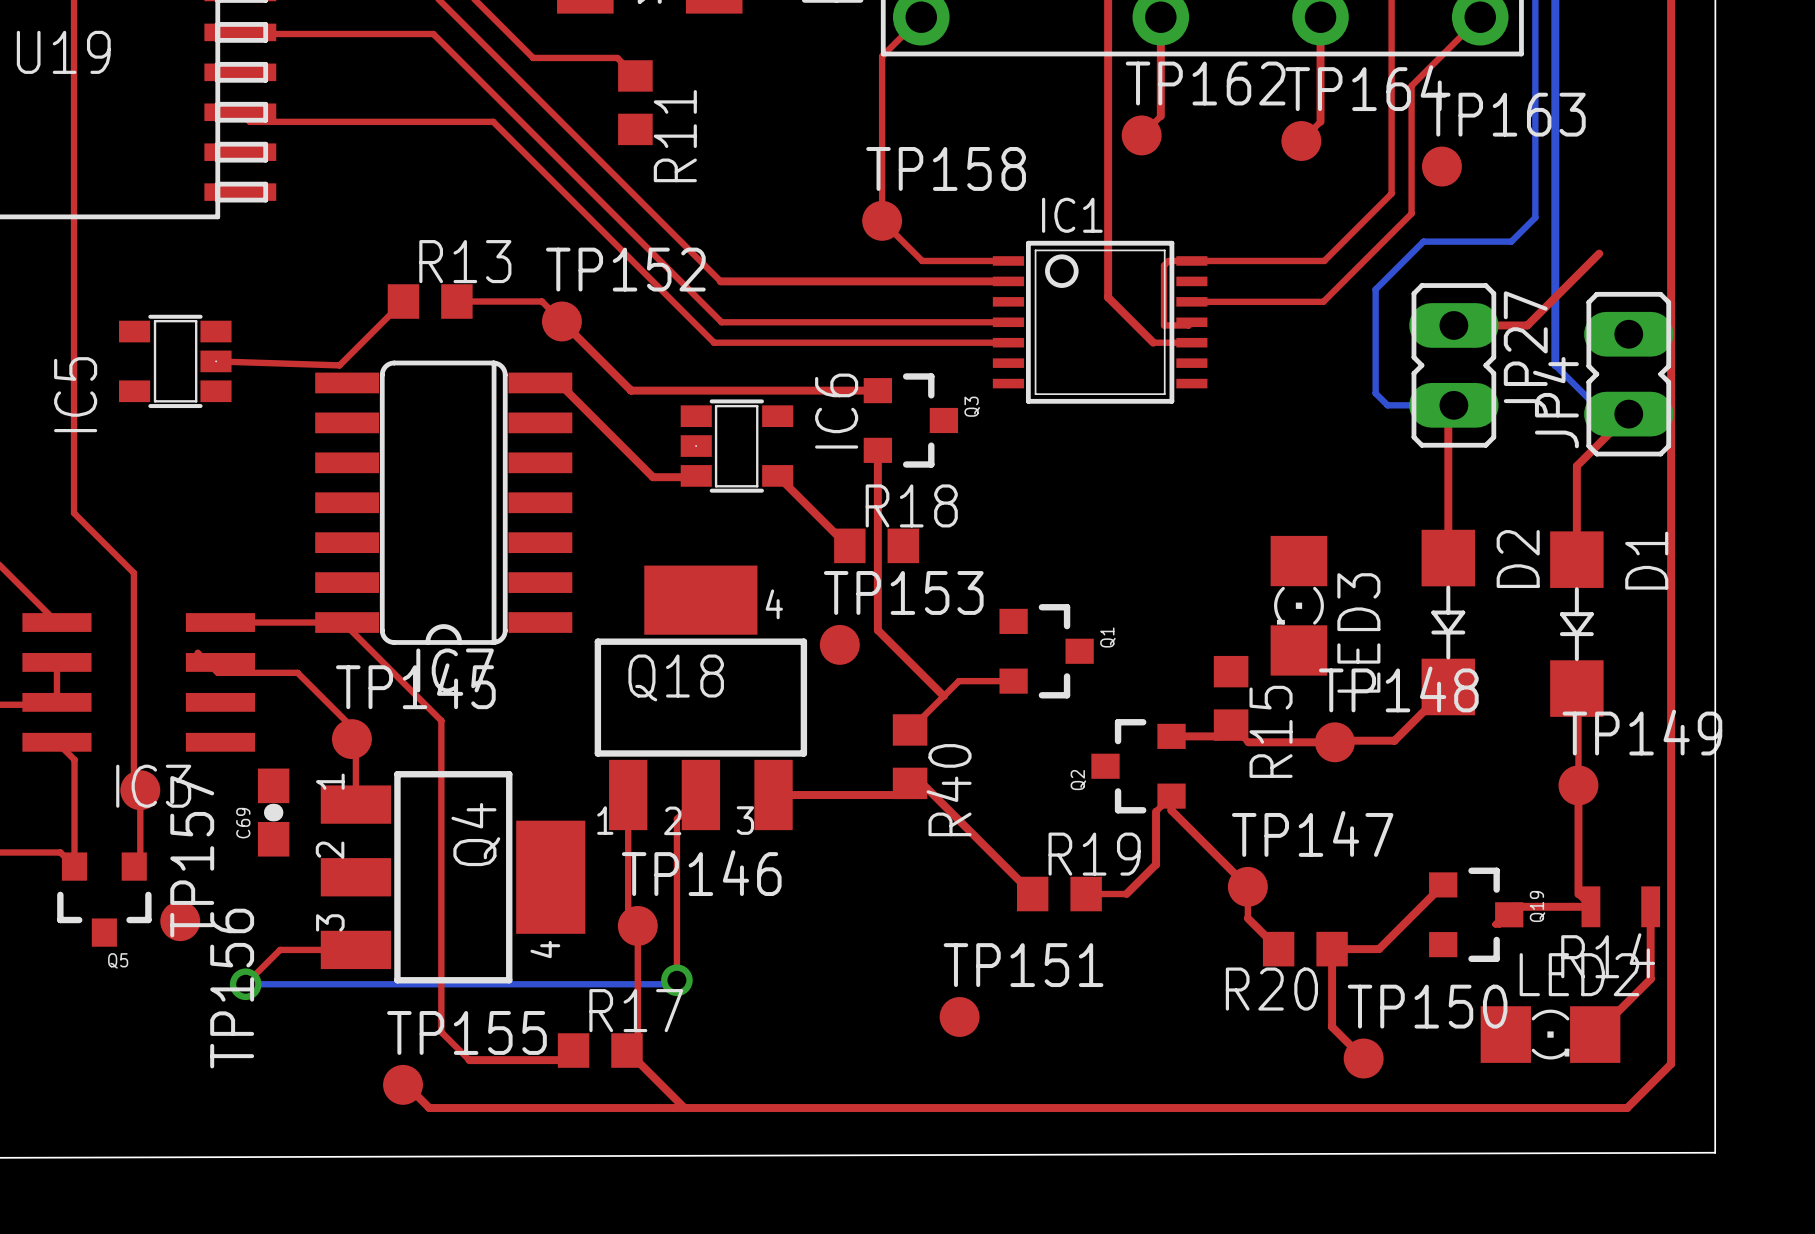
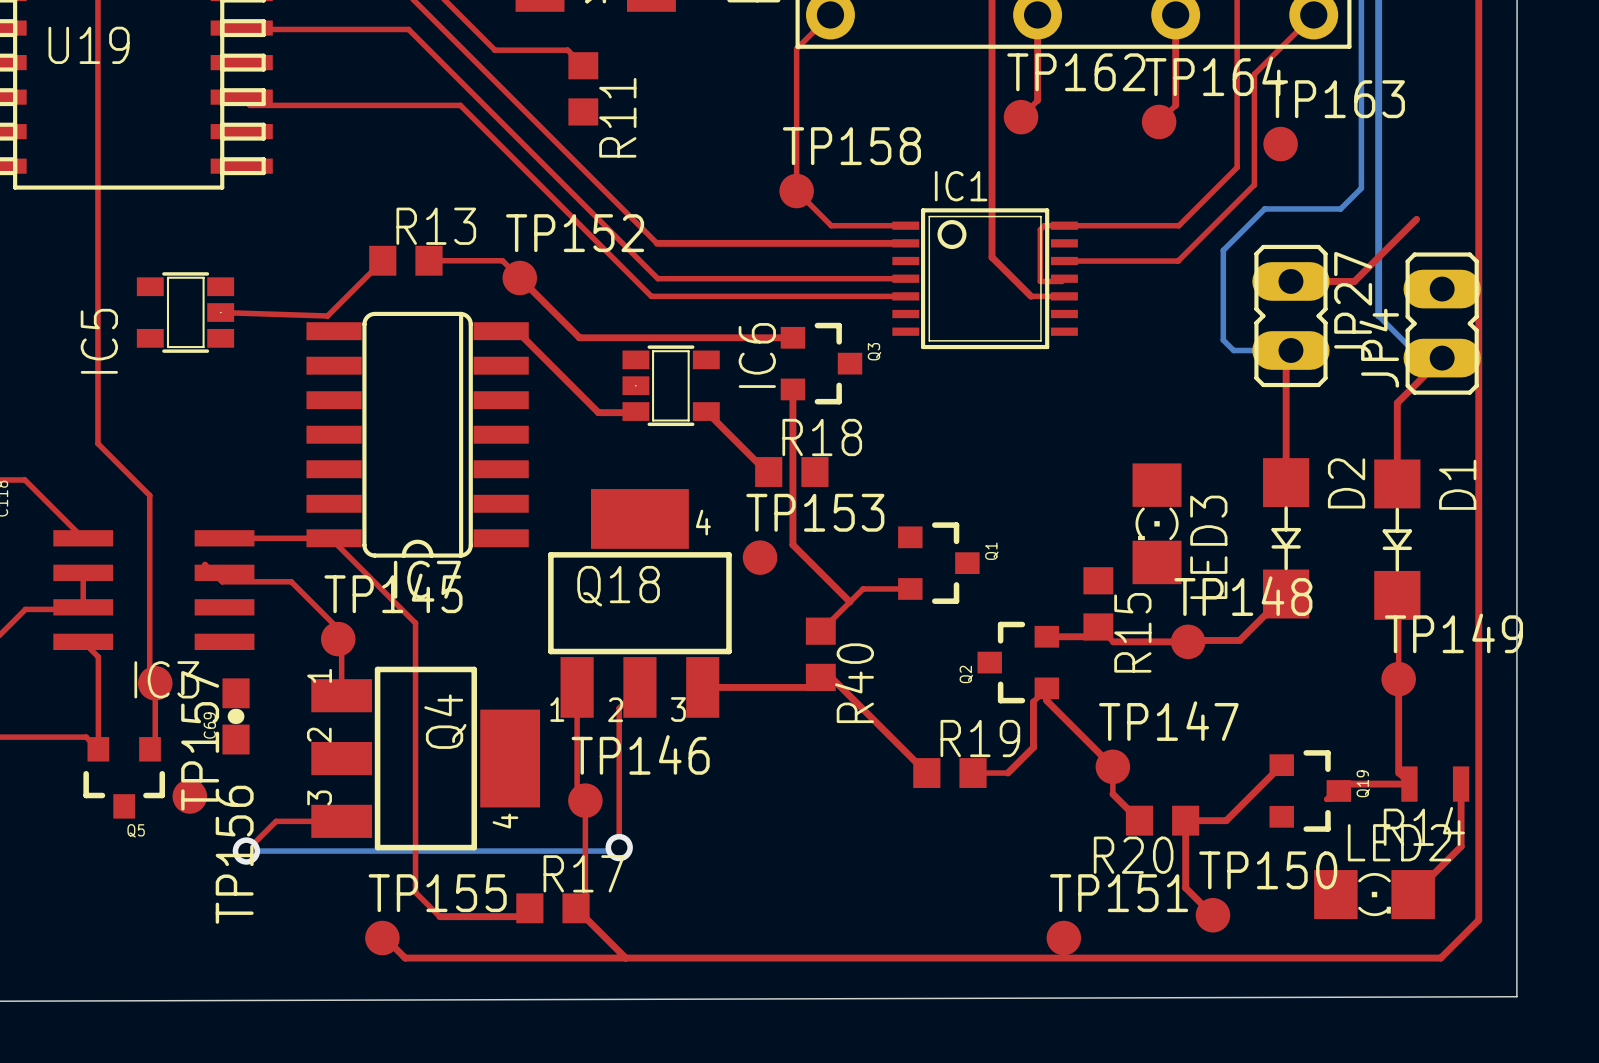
C69 position: (273, 812) -> (236, 716)
TP151 position: (959, 1016) -> (1063, 938)

